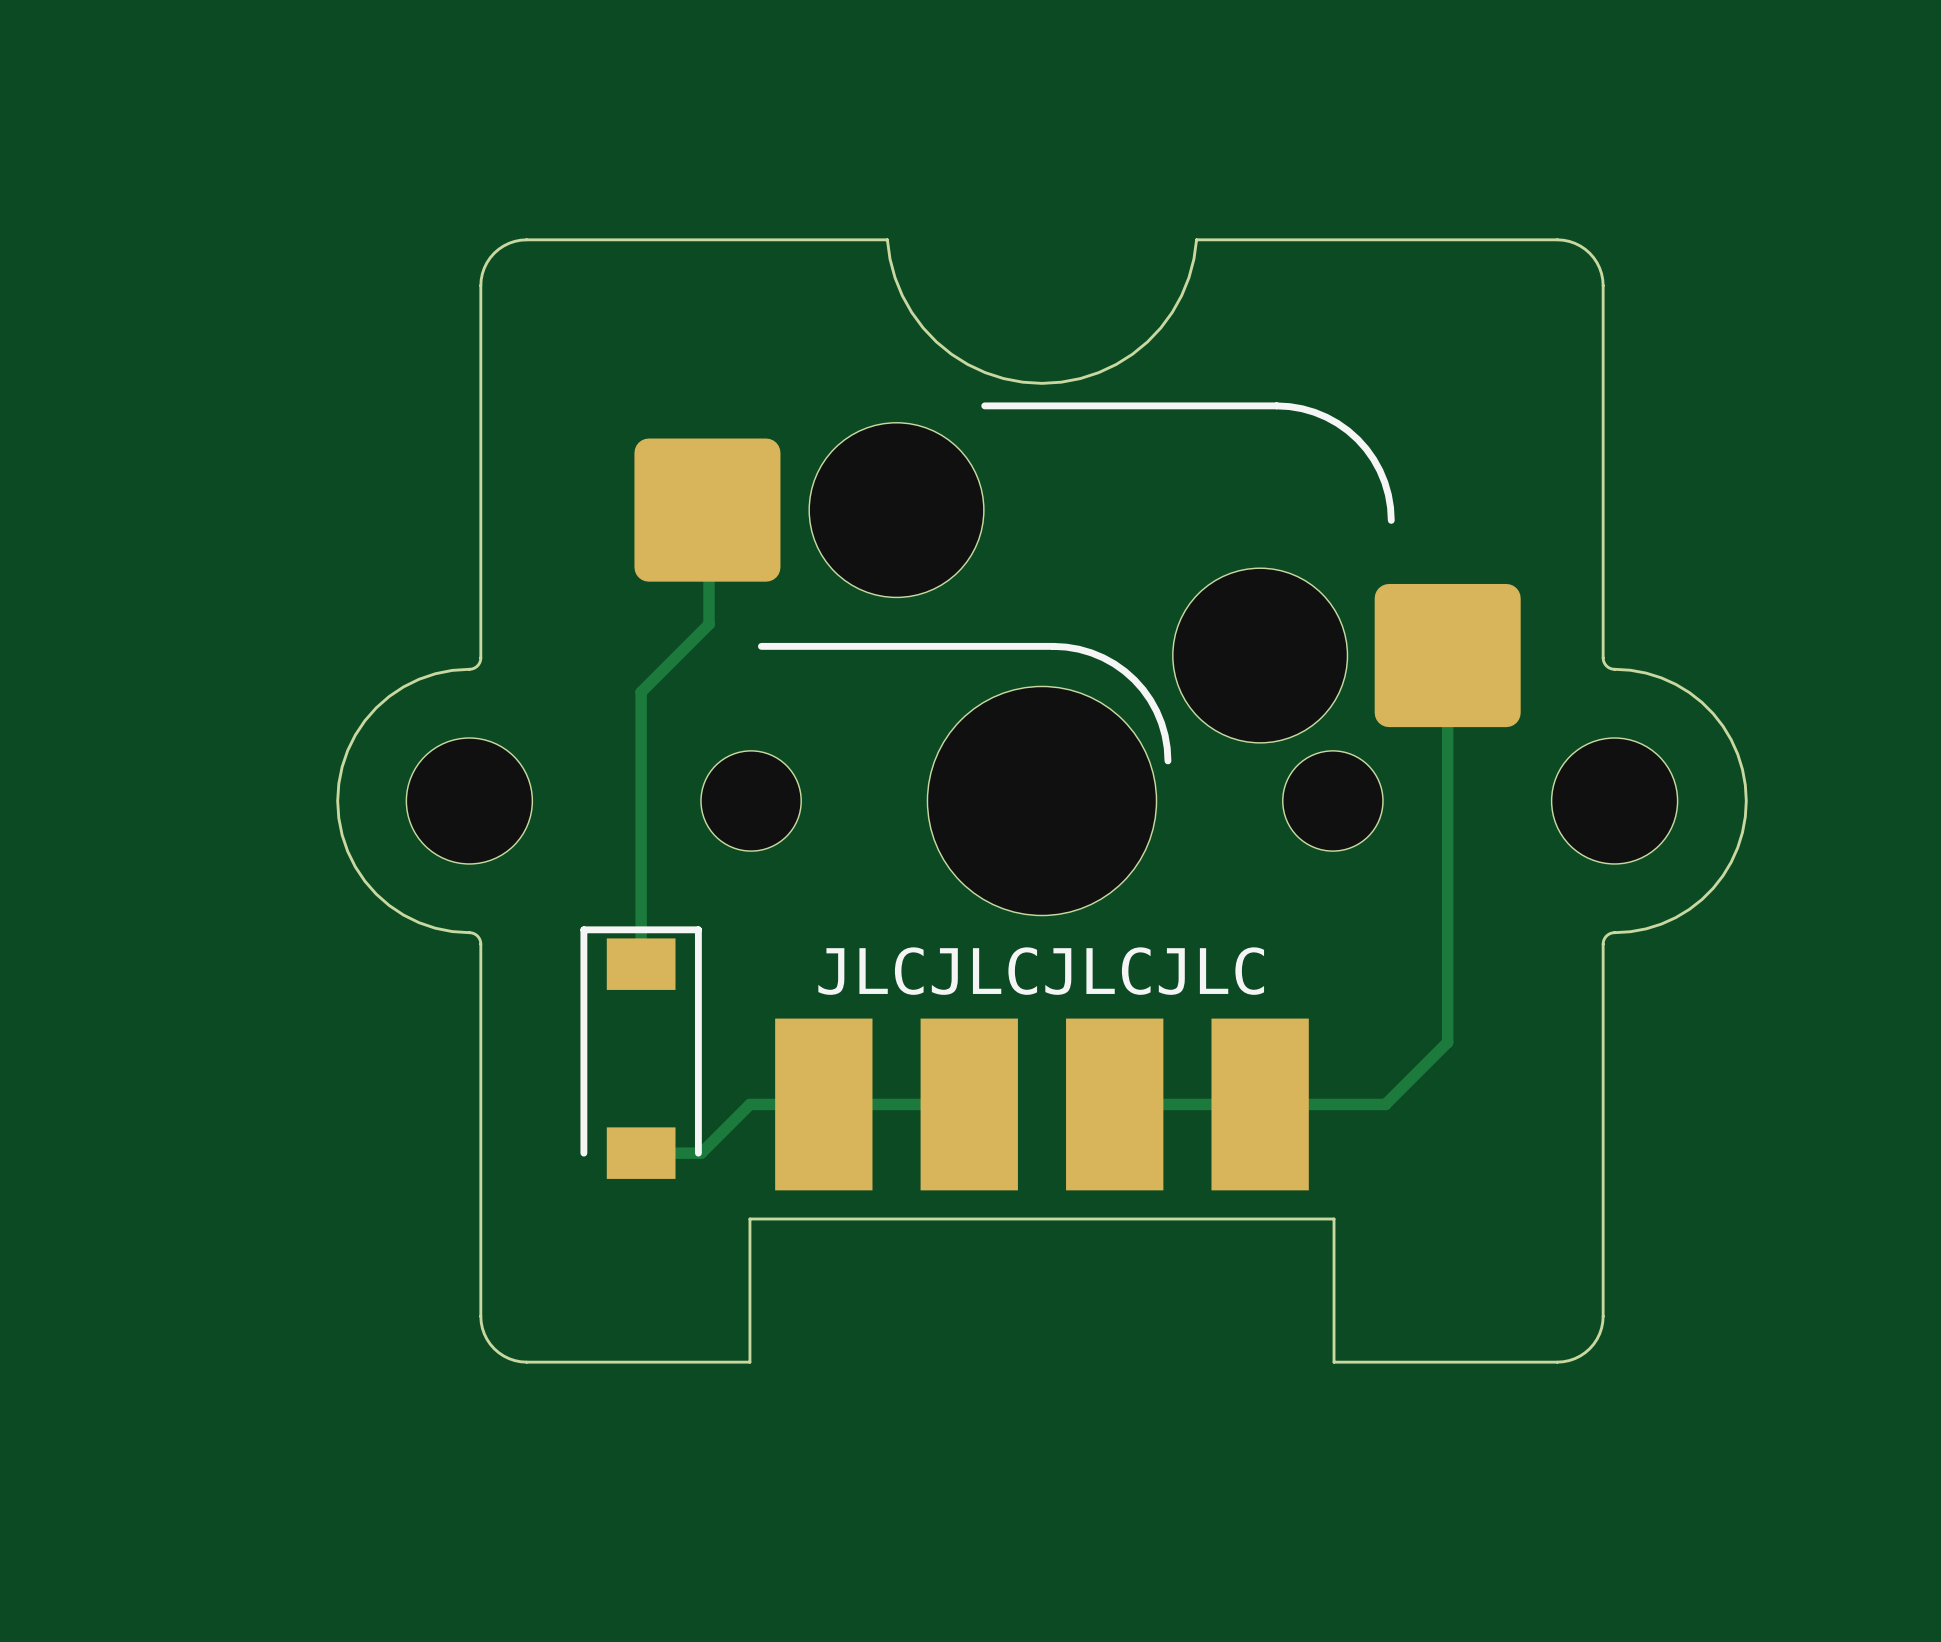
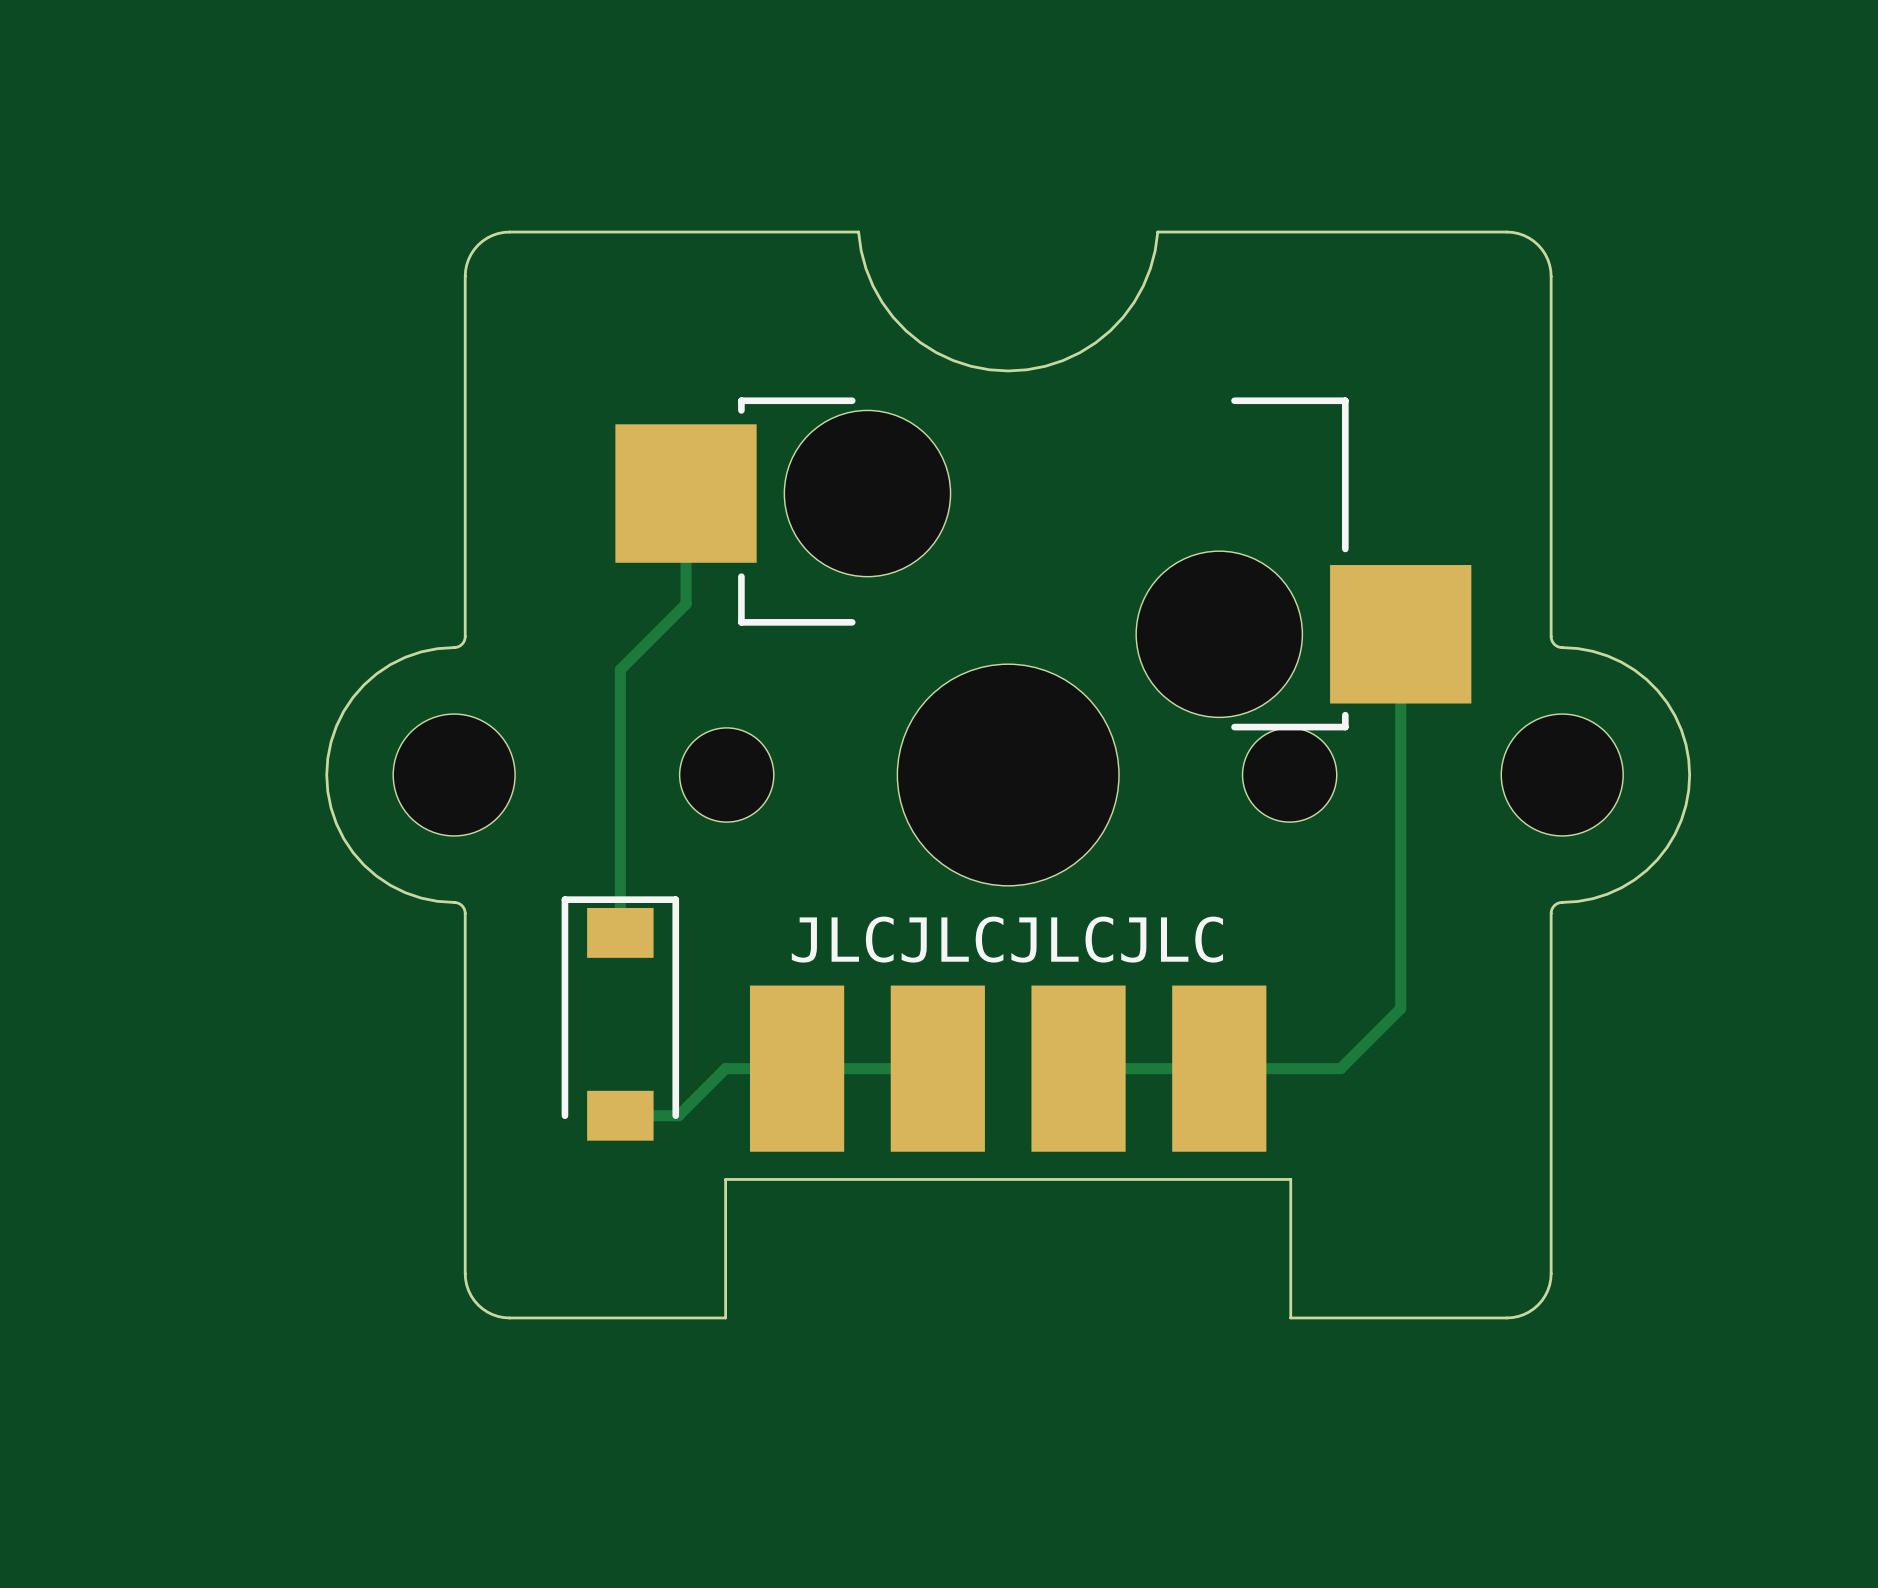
part footprint: [634, 402, 1521, 916] -> [615, 397, 1472, 886]

